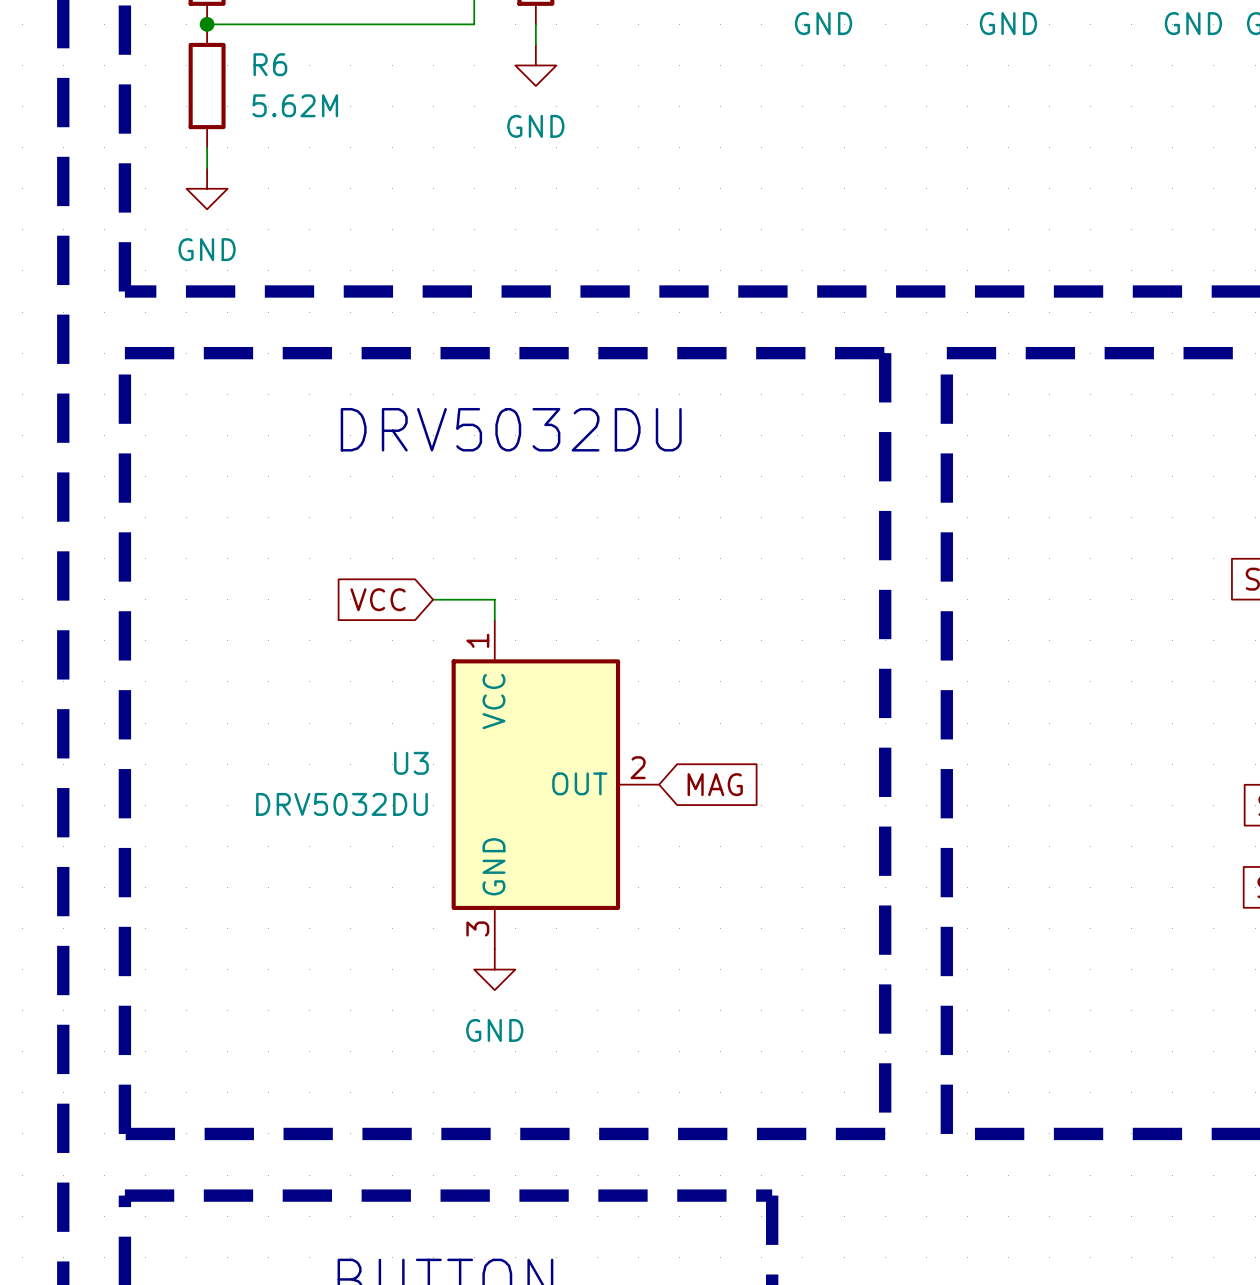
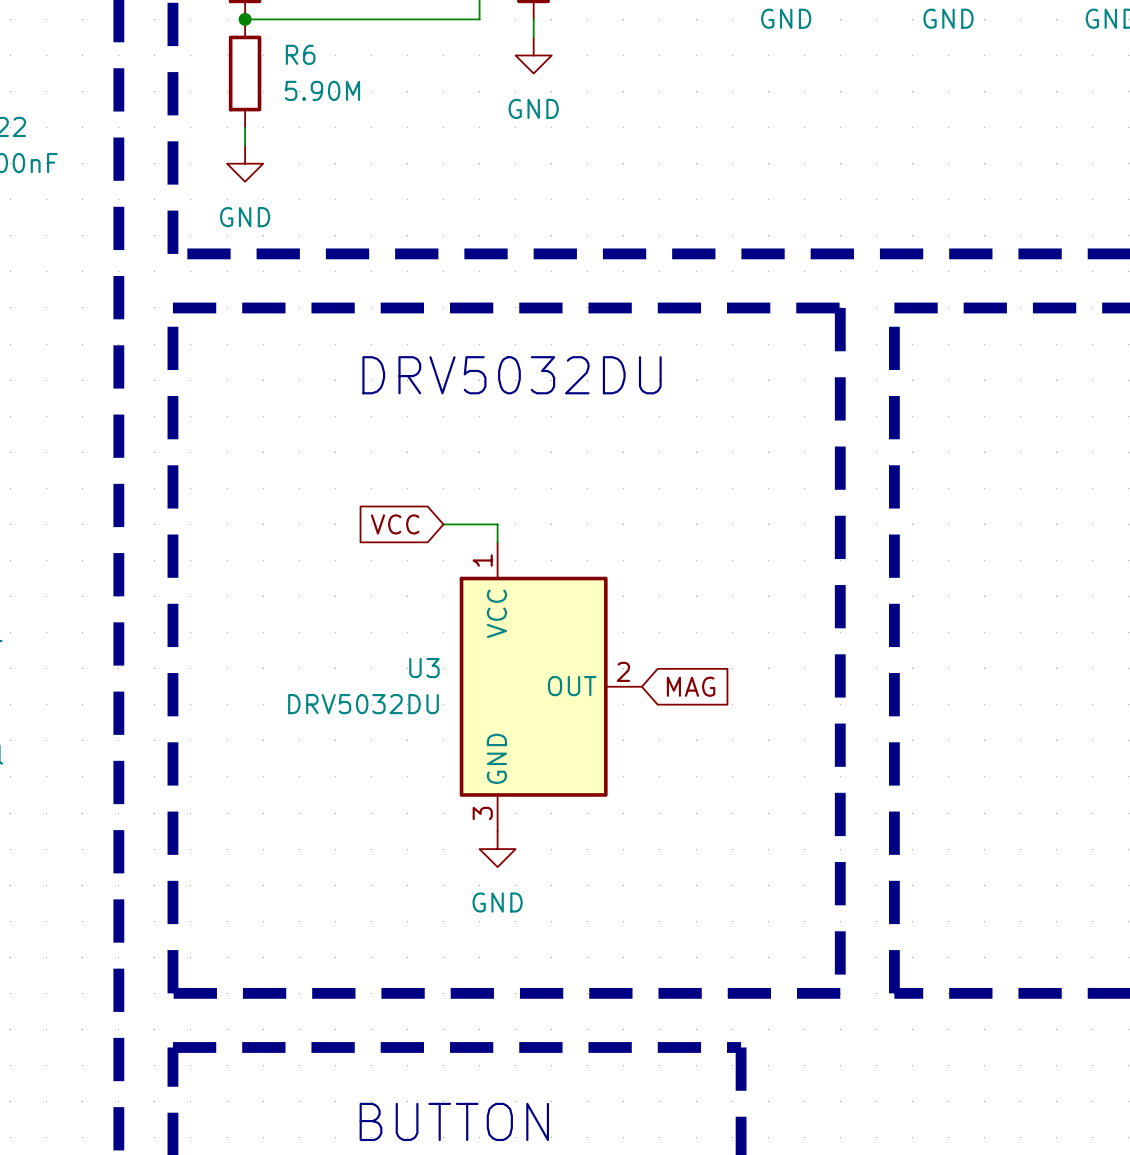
R6 value: 5.62M (295, 105) -> 5.90M (322, 90)

